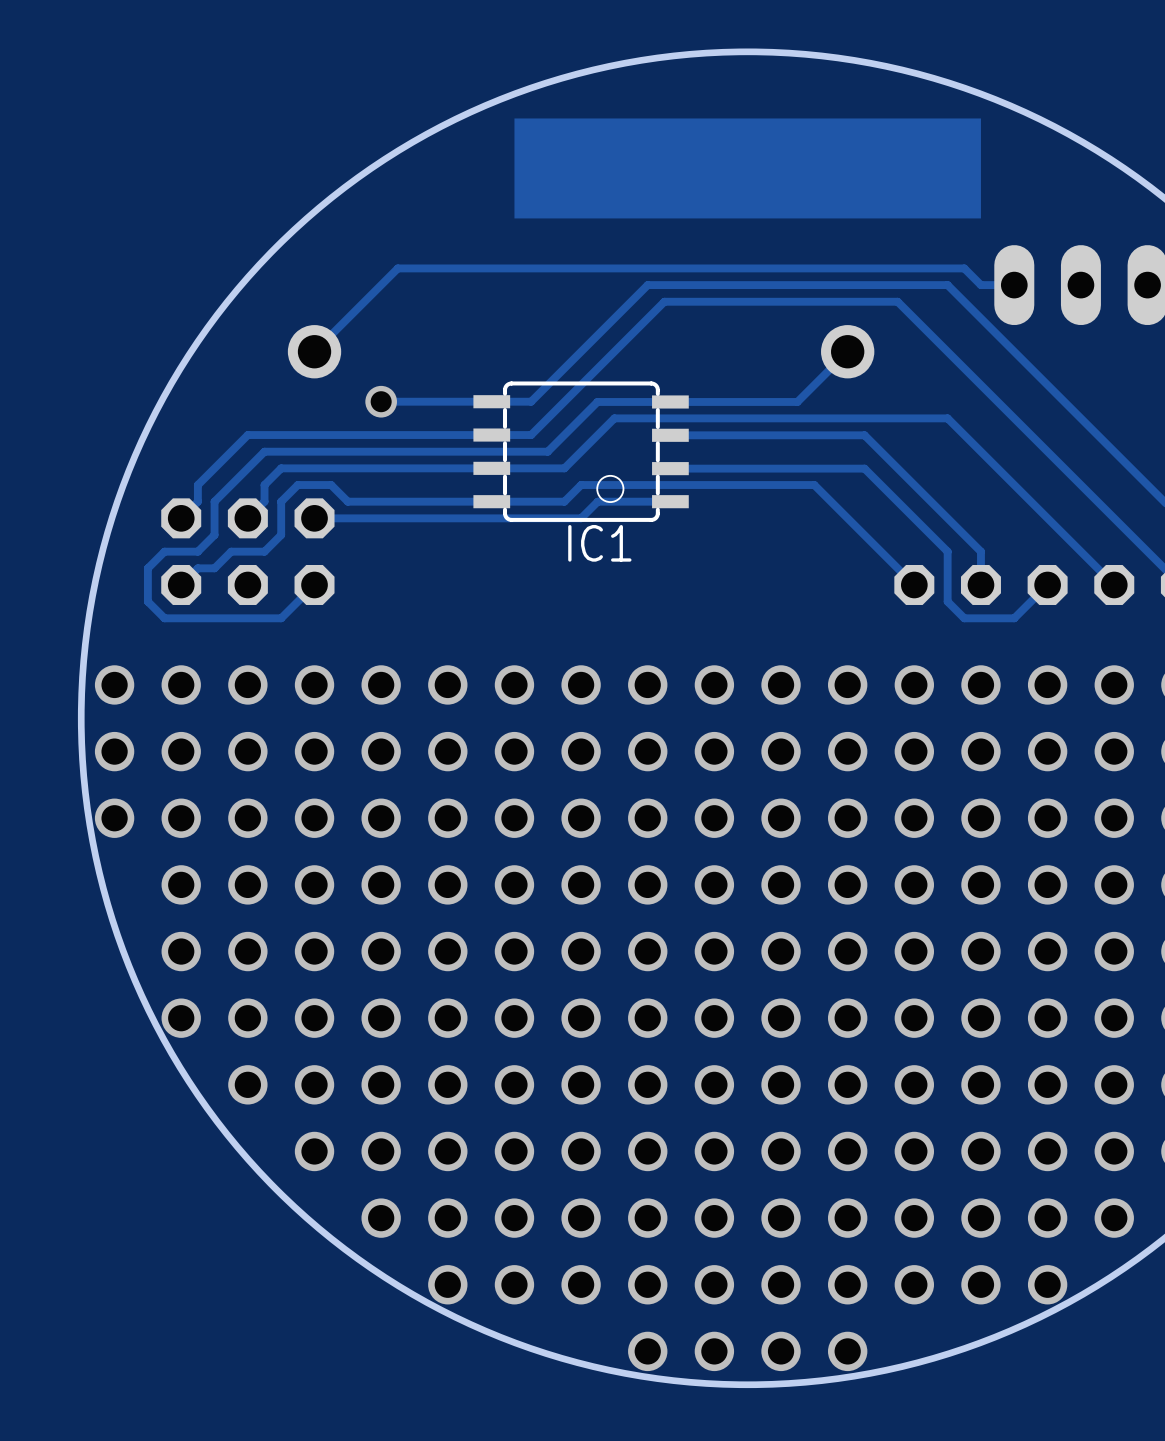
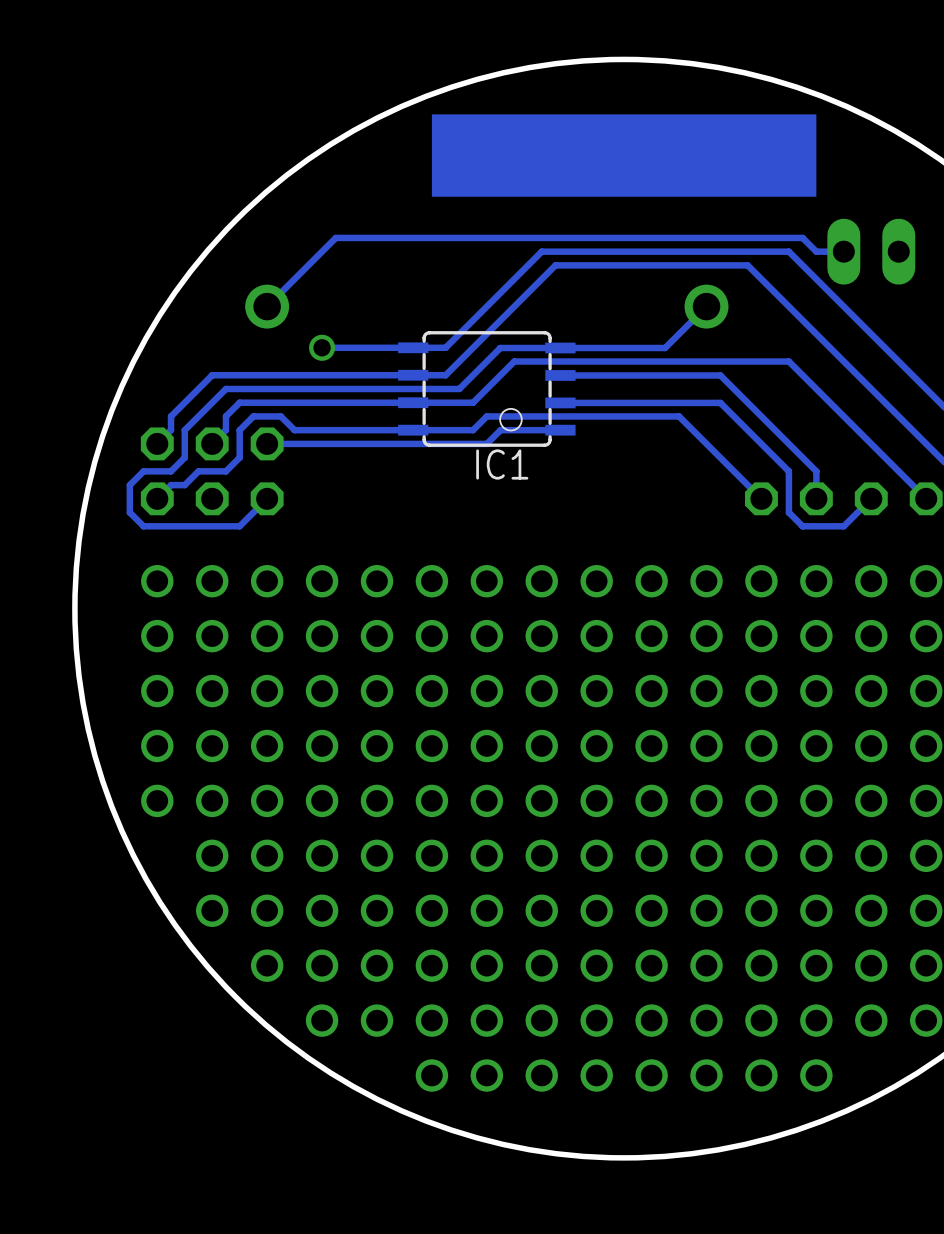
via: (114, 684) -> none
via: (114, 751) -> none
via: (114, 818) -> none
via: (181, 1018) -> none
via: (447, 1284) -> none
via: (1047, 1284) -> none
via: (647, 1351) -> none
via: (714, 1351) -> none
via: (781, 1351) -> none
via: (847, 1351) -> none

